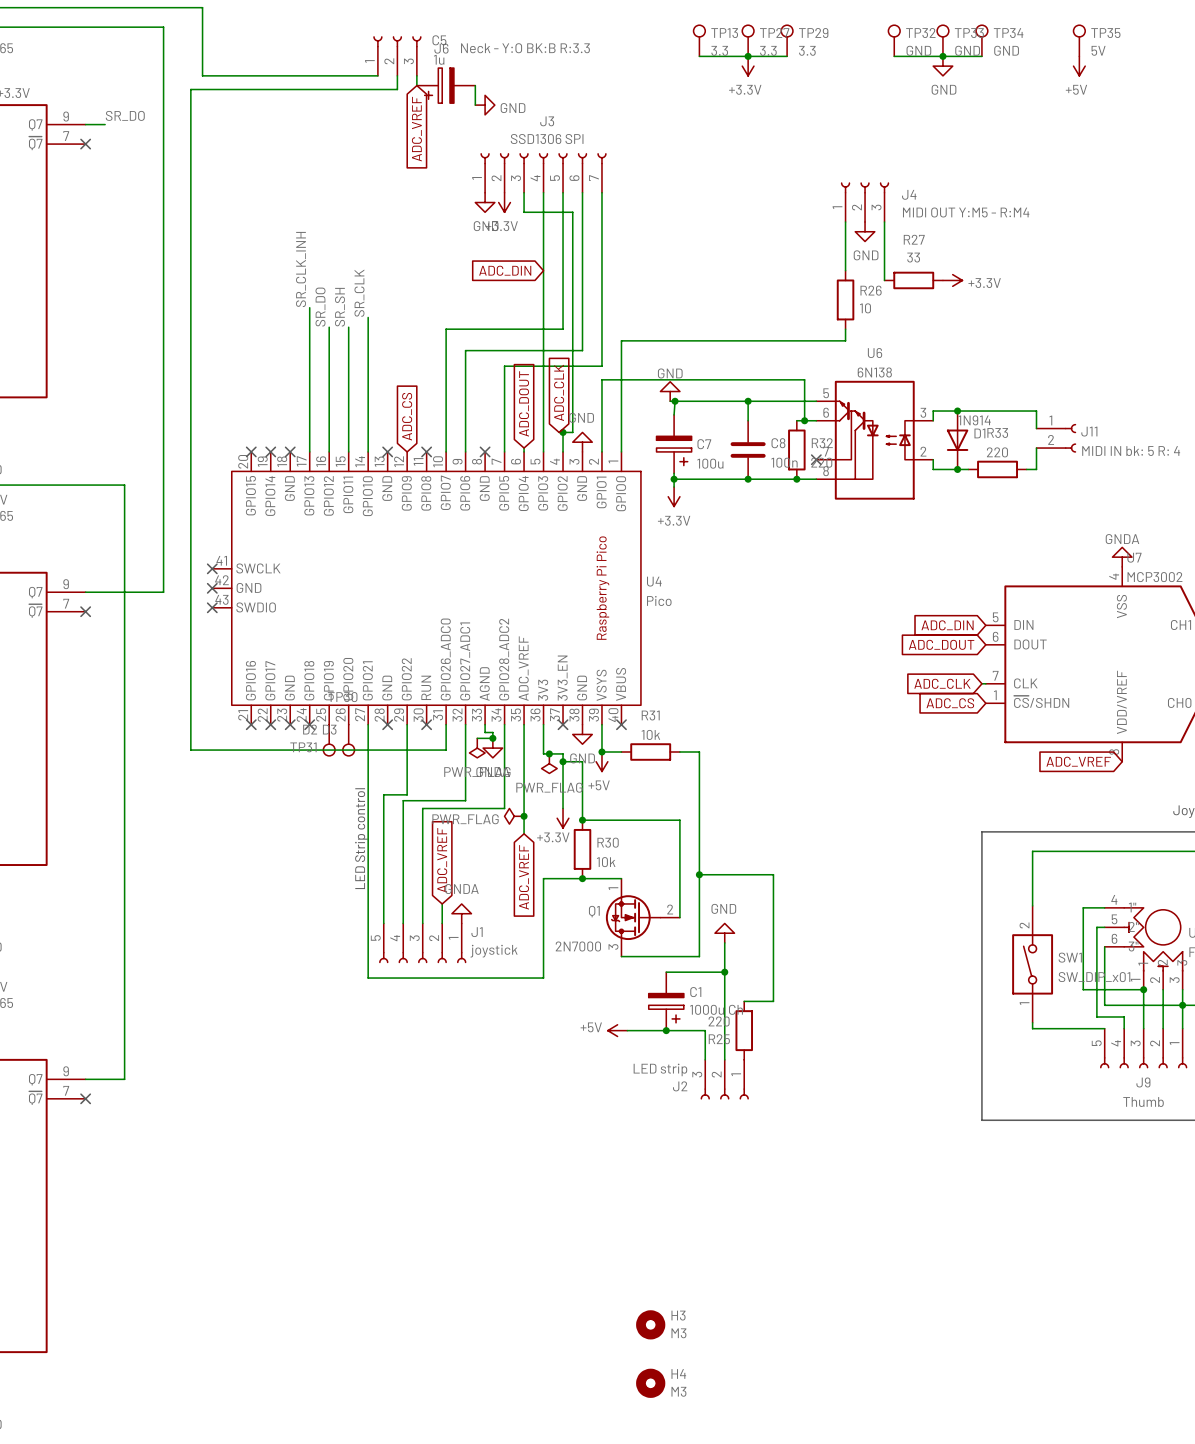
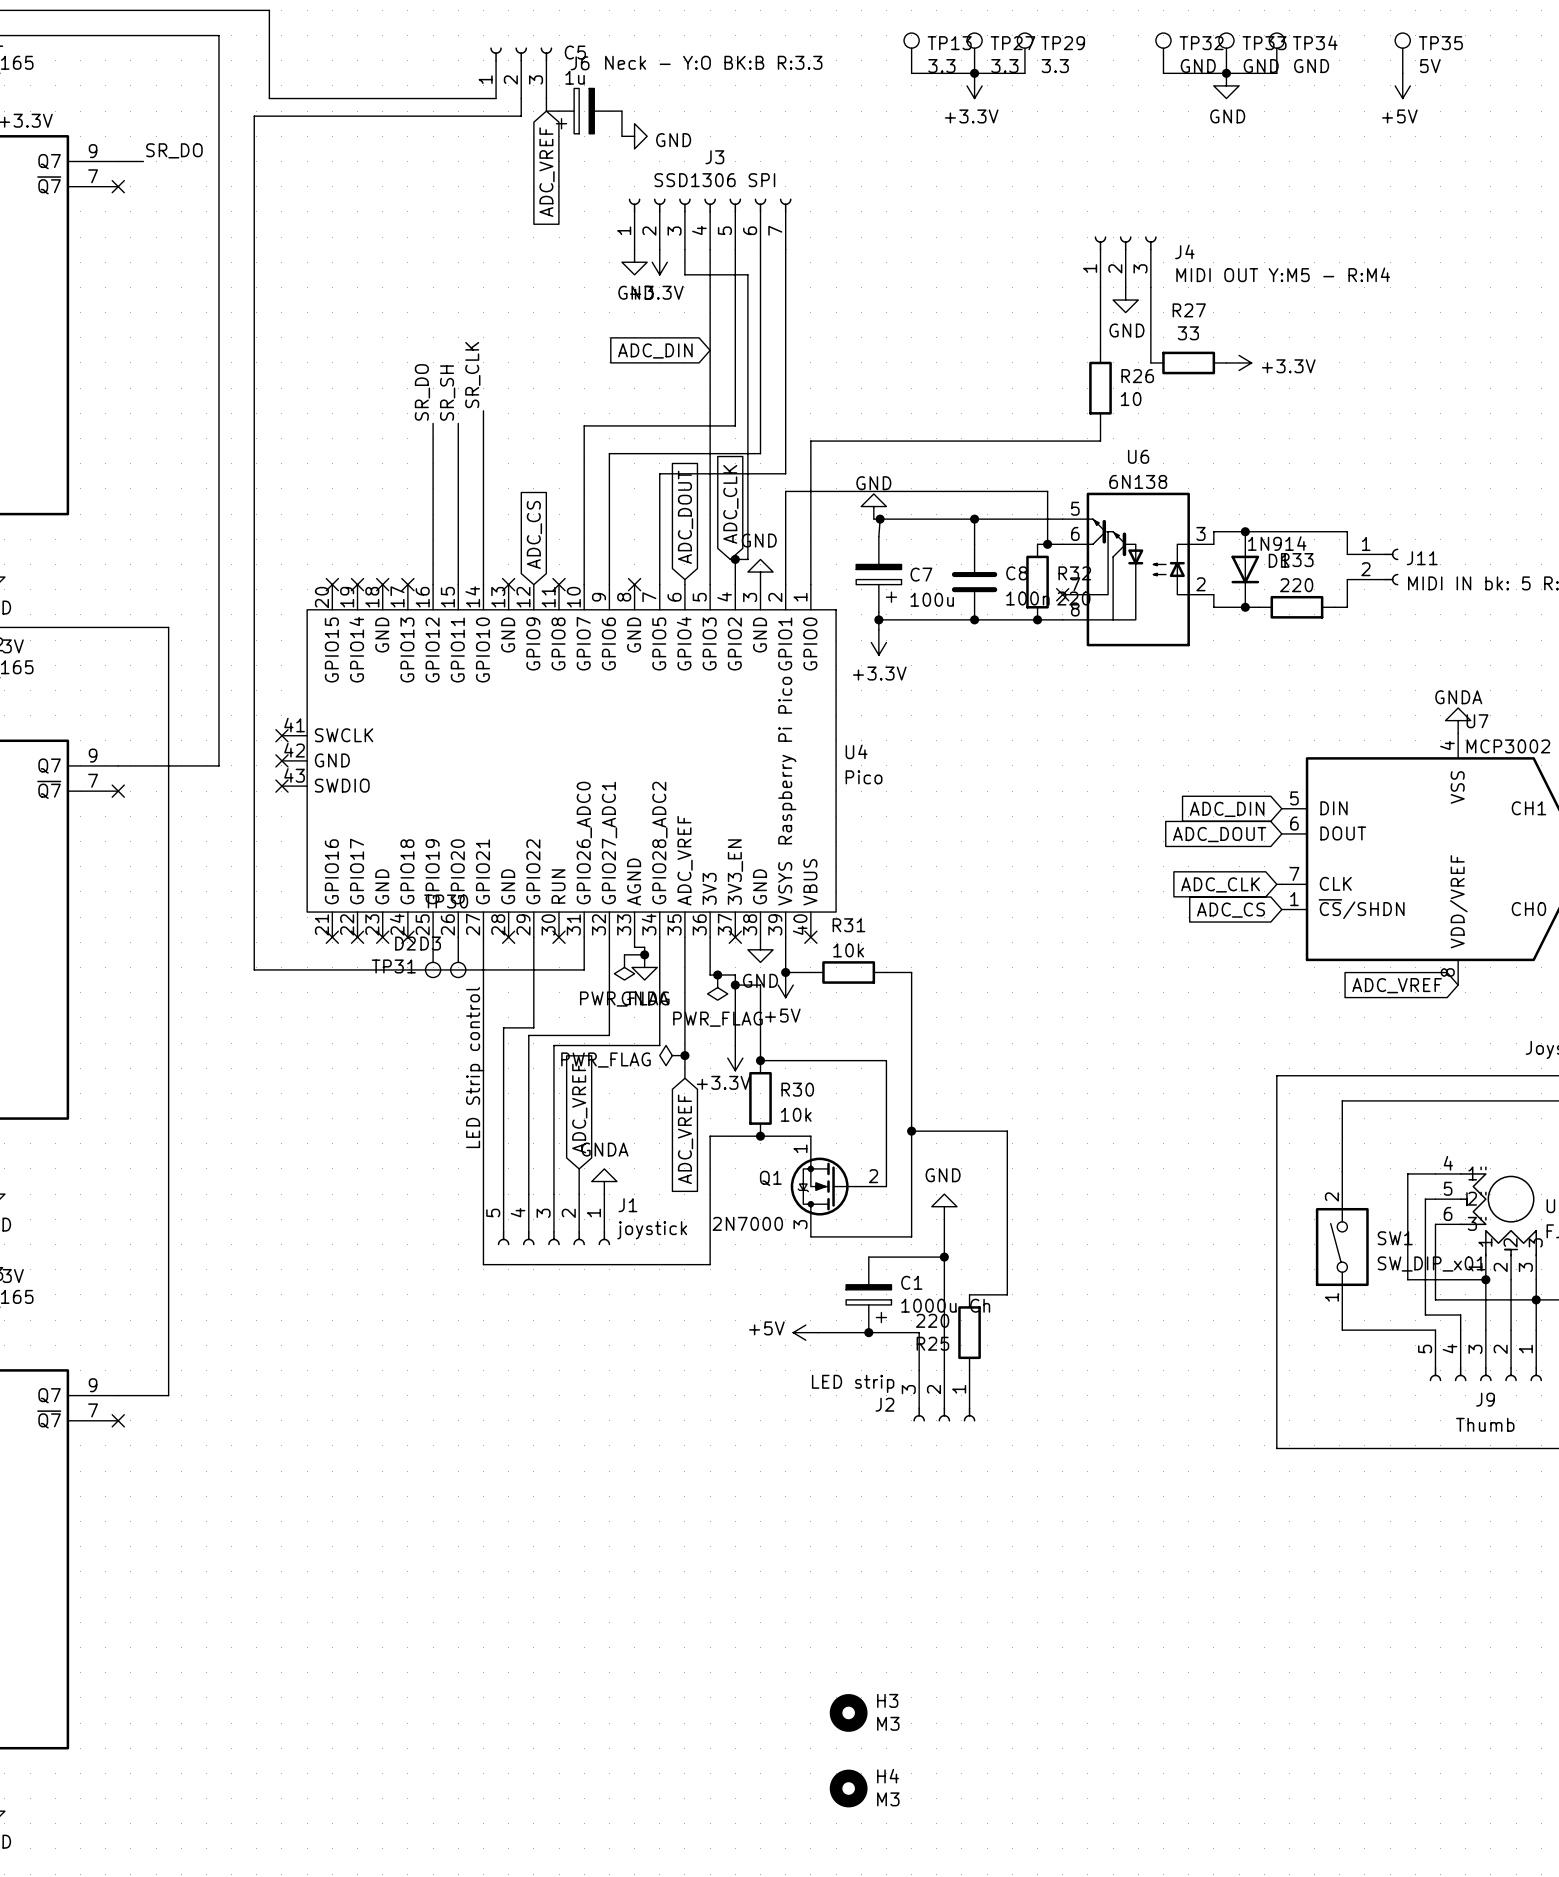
label: SR_CLK_INH (301, 269) -> none
wire: (309, 307) (309, 451) -> none
no-connect mark: none -> (407, 584)

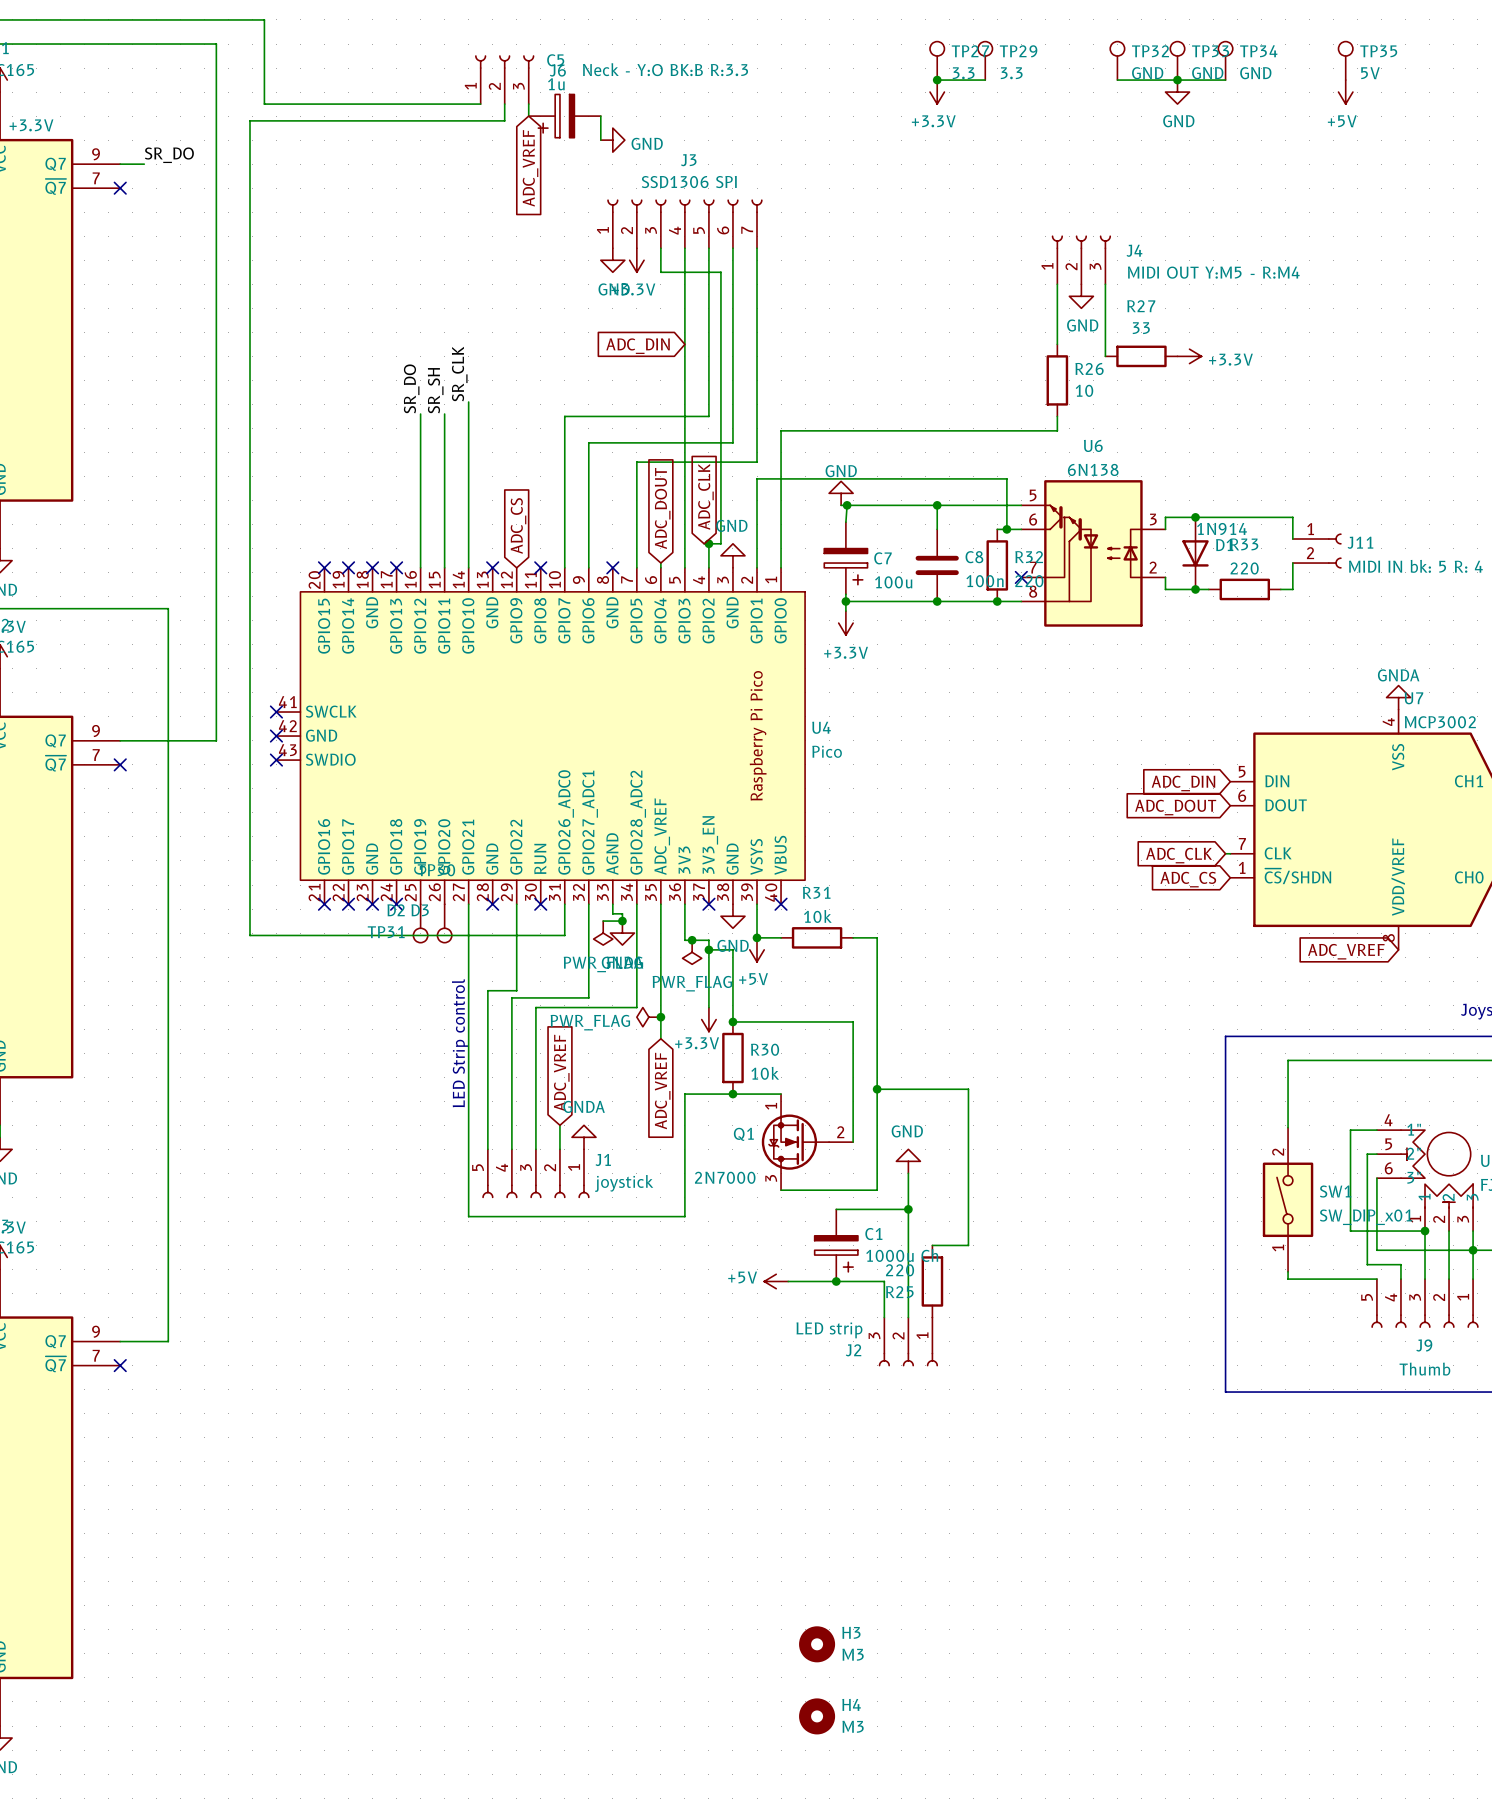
TP13: 3.3 (911, 53) -> none
wire: (911, 73) (974, 73) -> none

